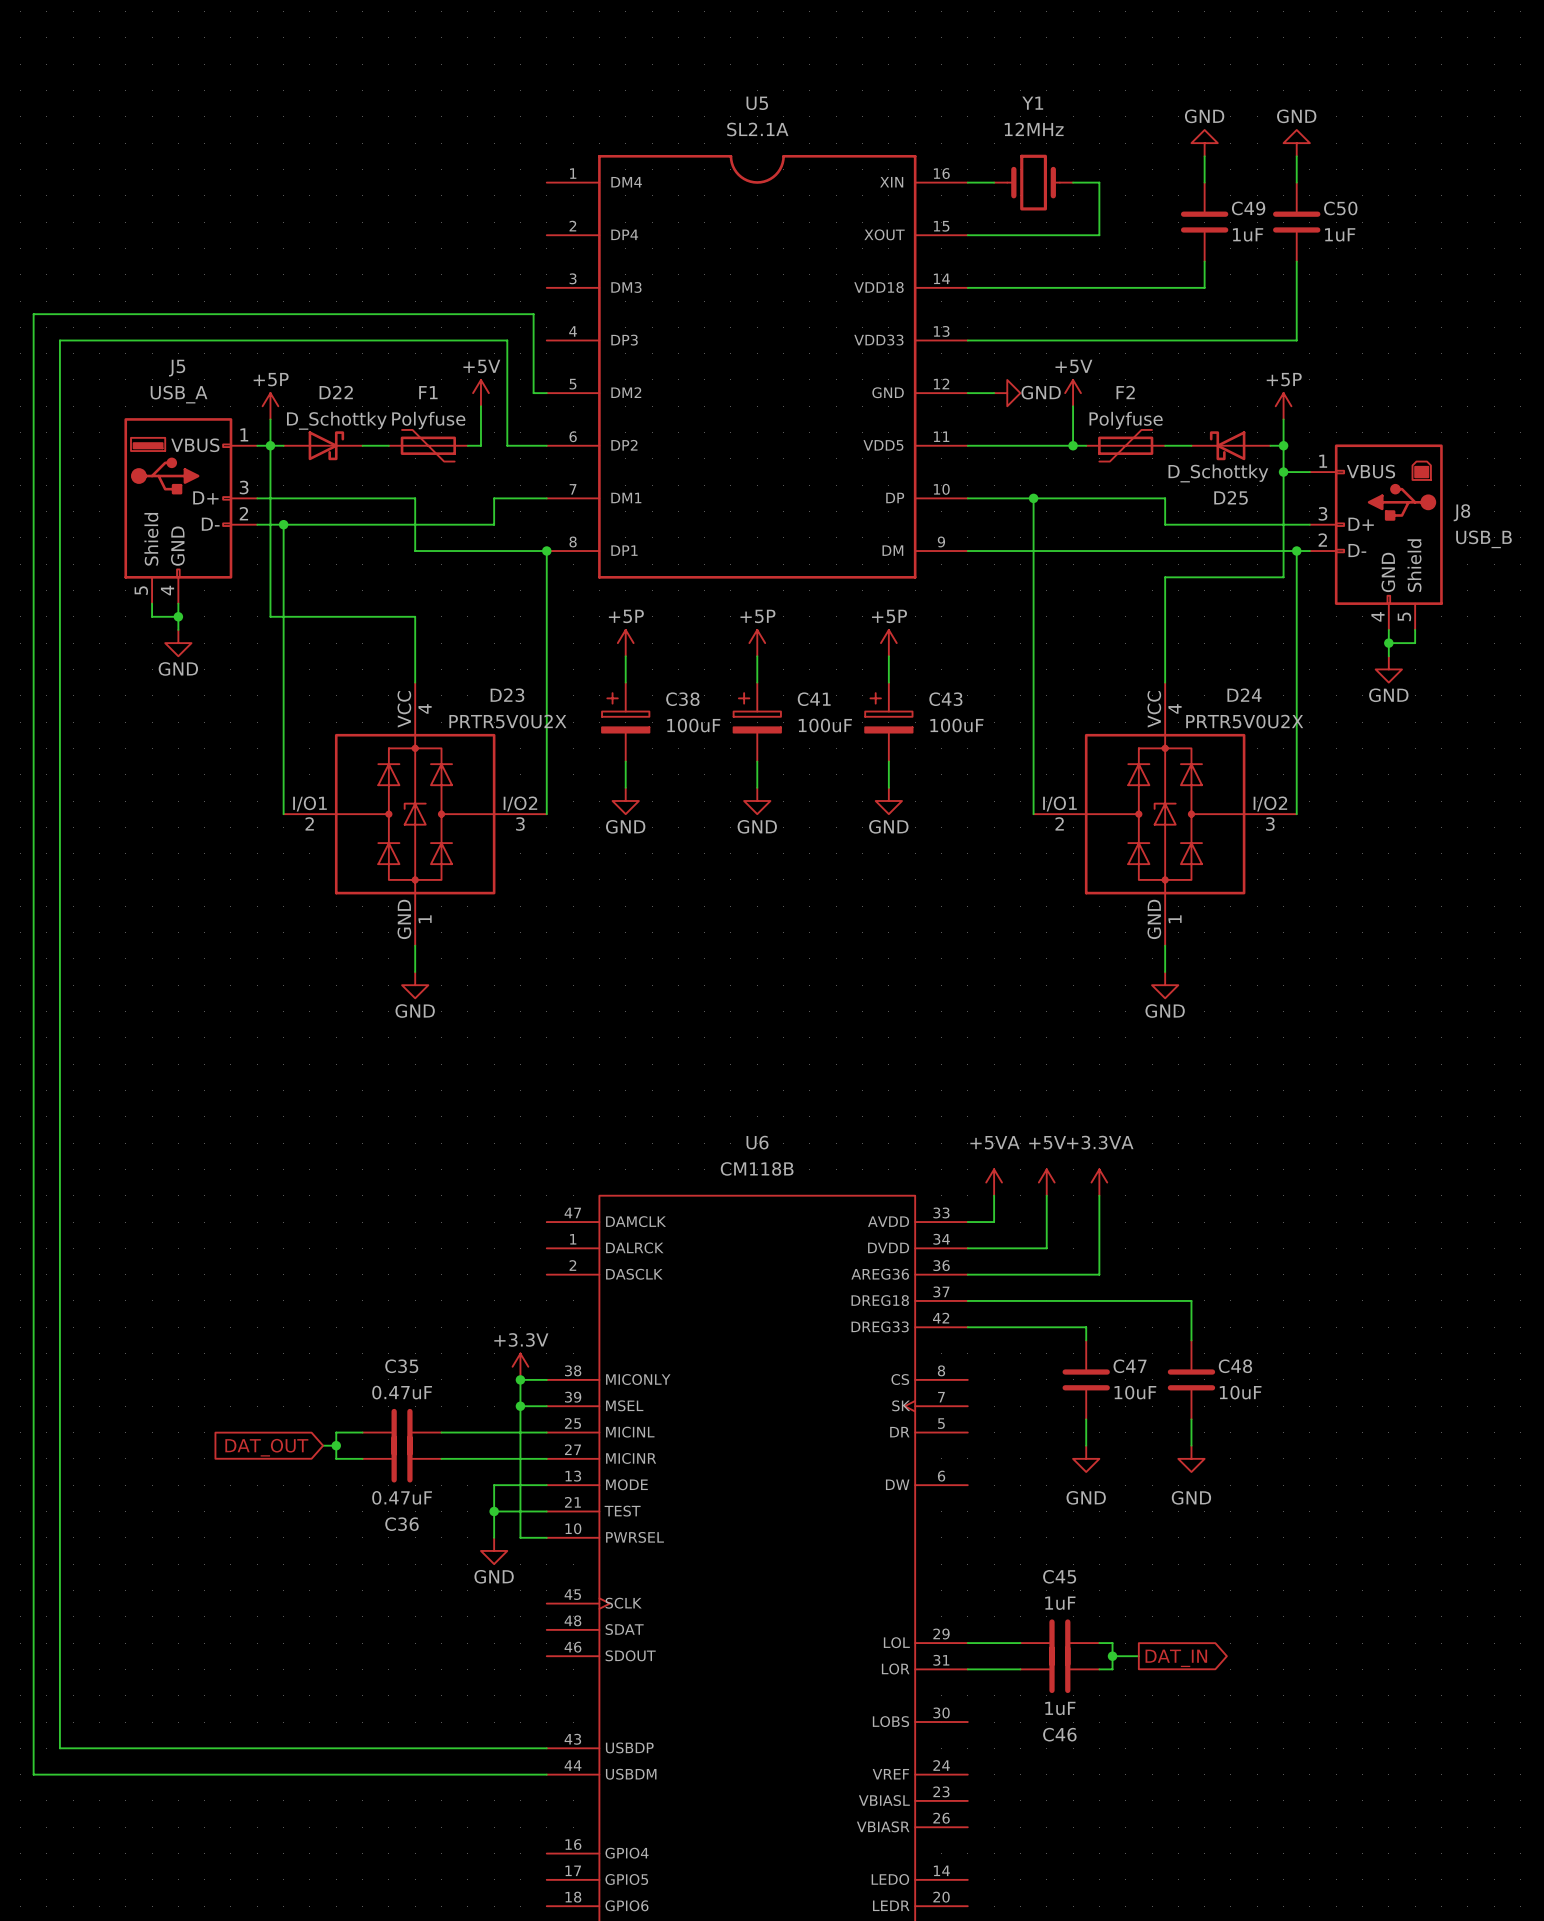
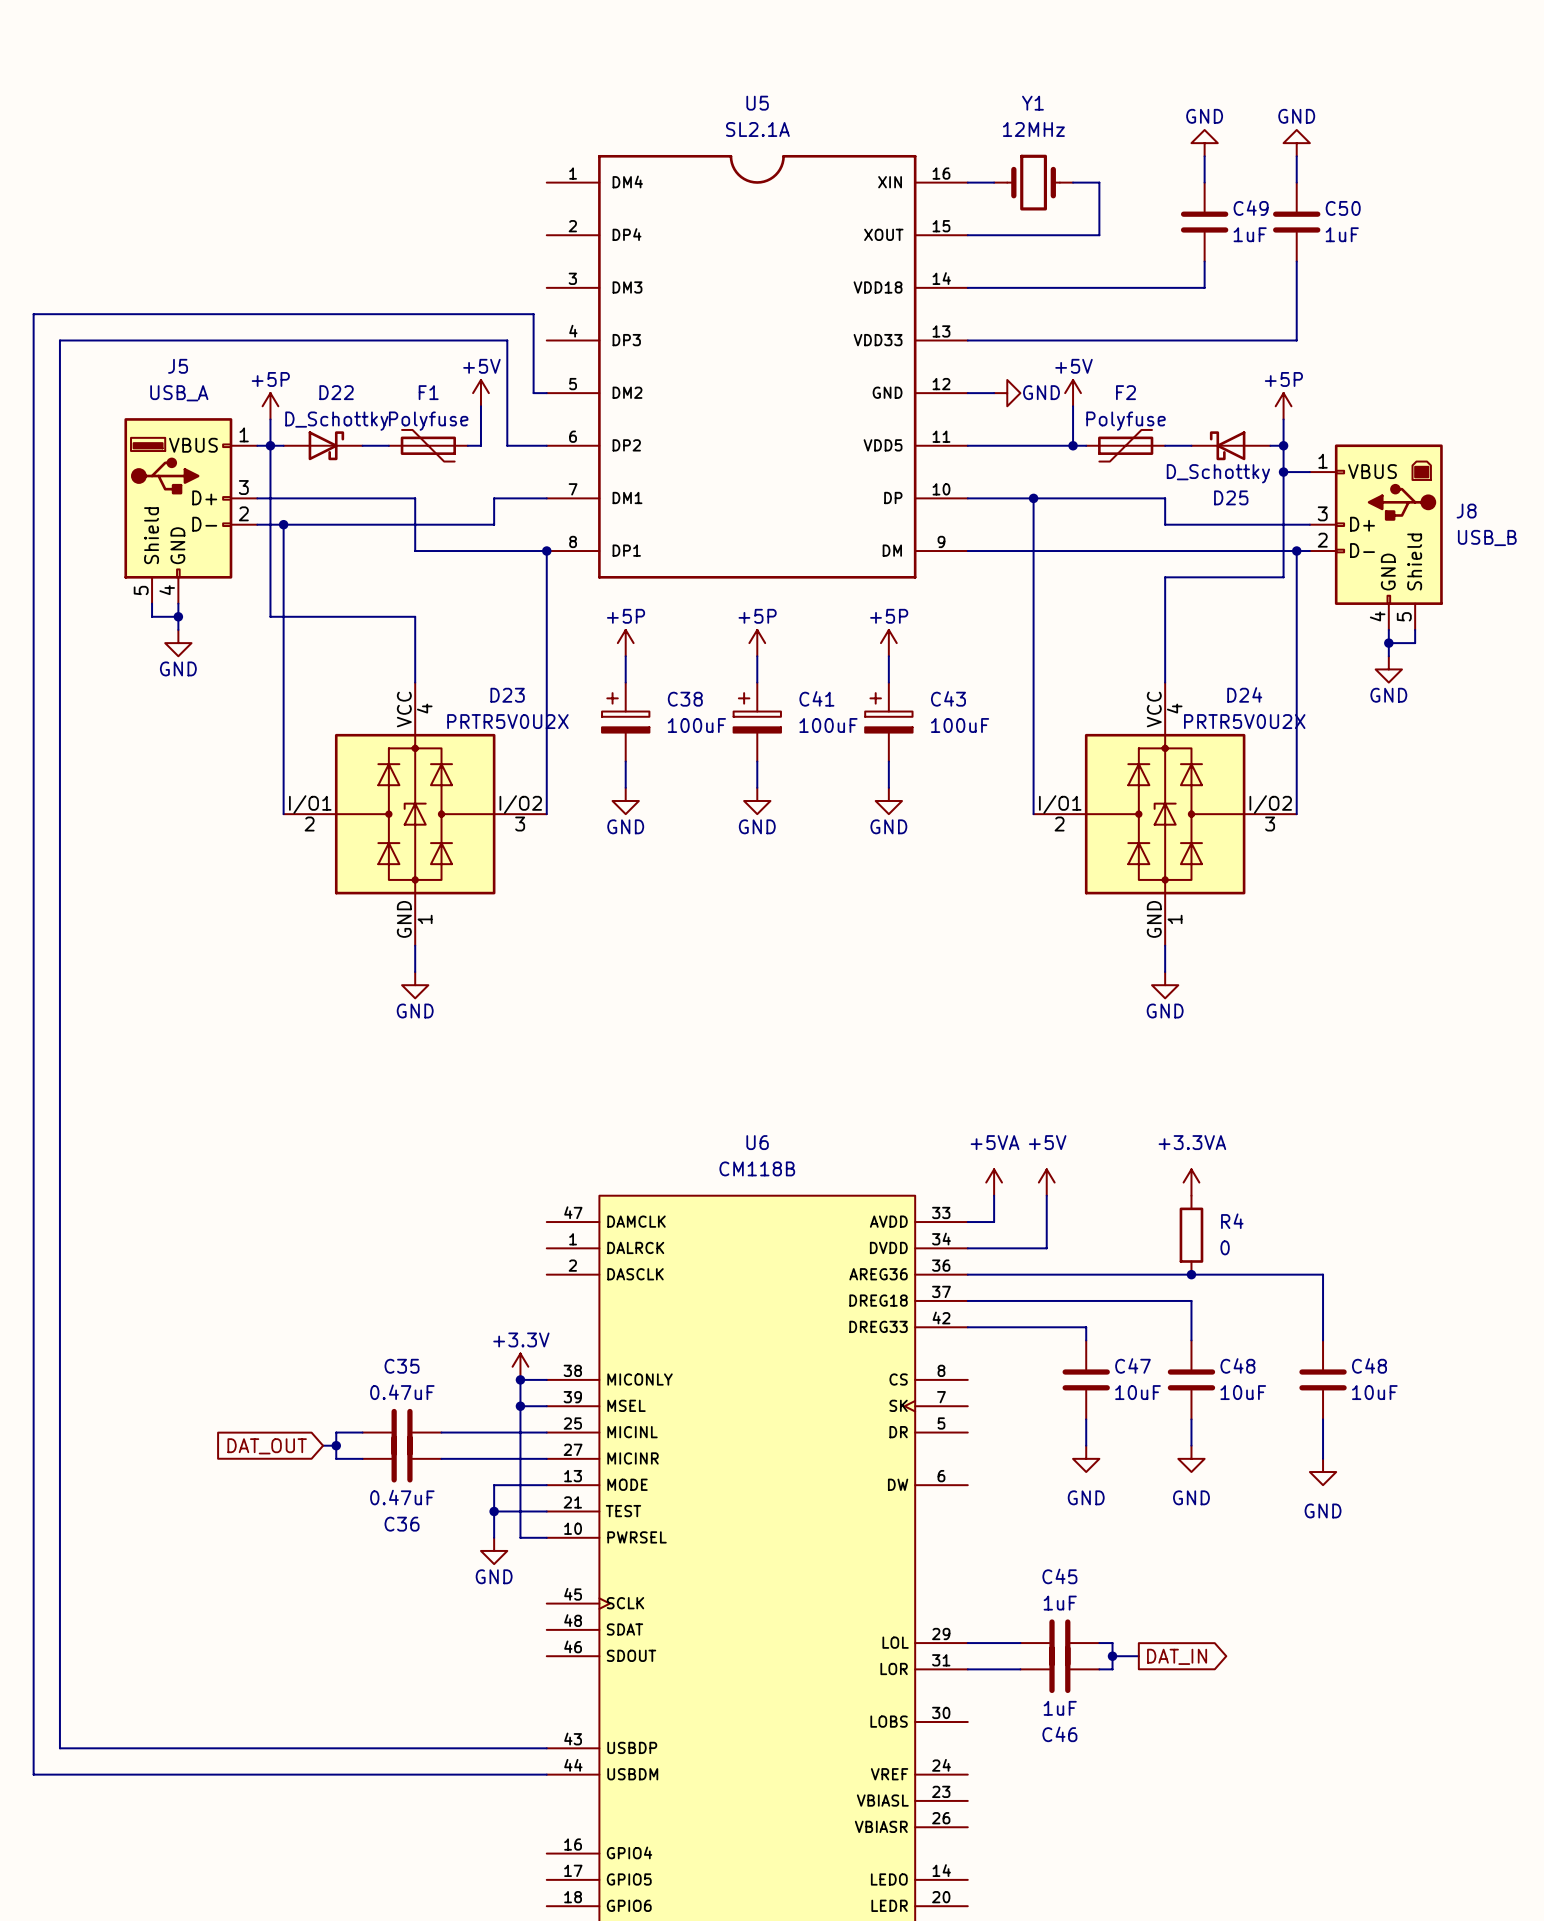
power symbol position: +3.3VA (1099, 1182) -> +3.3VA (1191, 1182)
wire: (1099, 1195) (1099, 1274) -> (1323, 1340) (1323, 1274) (1099, 1274)
R4: none -> 0 (1191, 1235)
junction: none -> (1191, 1274)
C48: none -> 10uF (1323, 1379)
wire: none -> (1323, 1419) (1323, 1458)
power symbol: none -> GND (1323, 1472)

